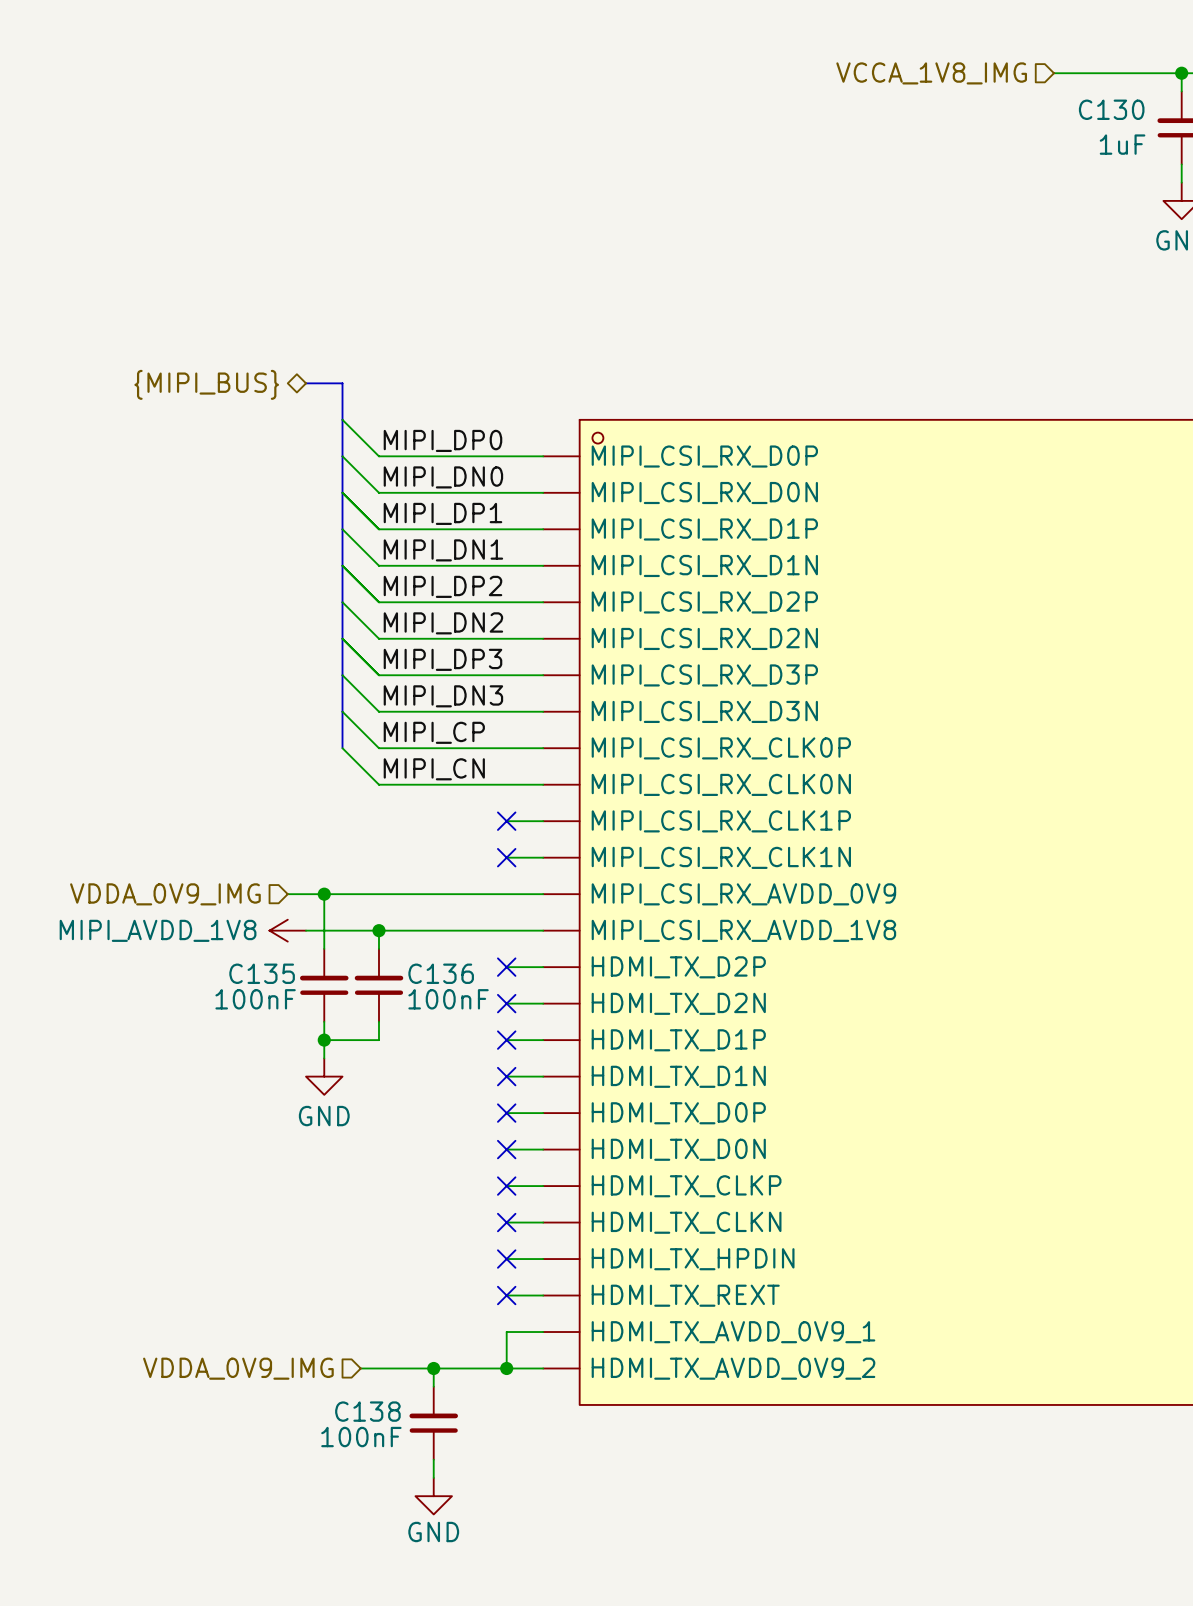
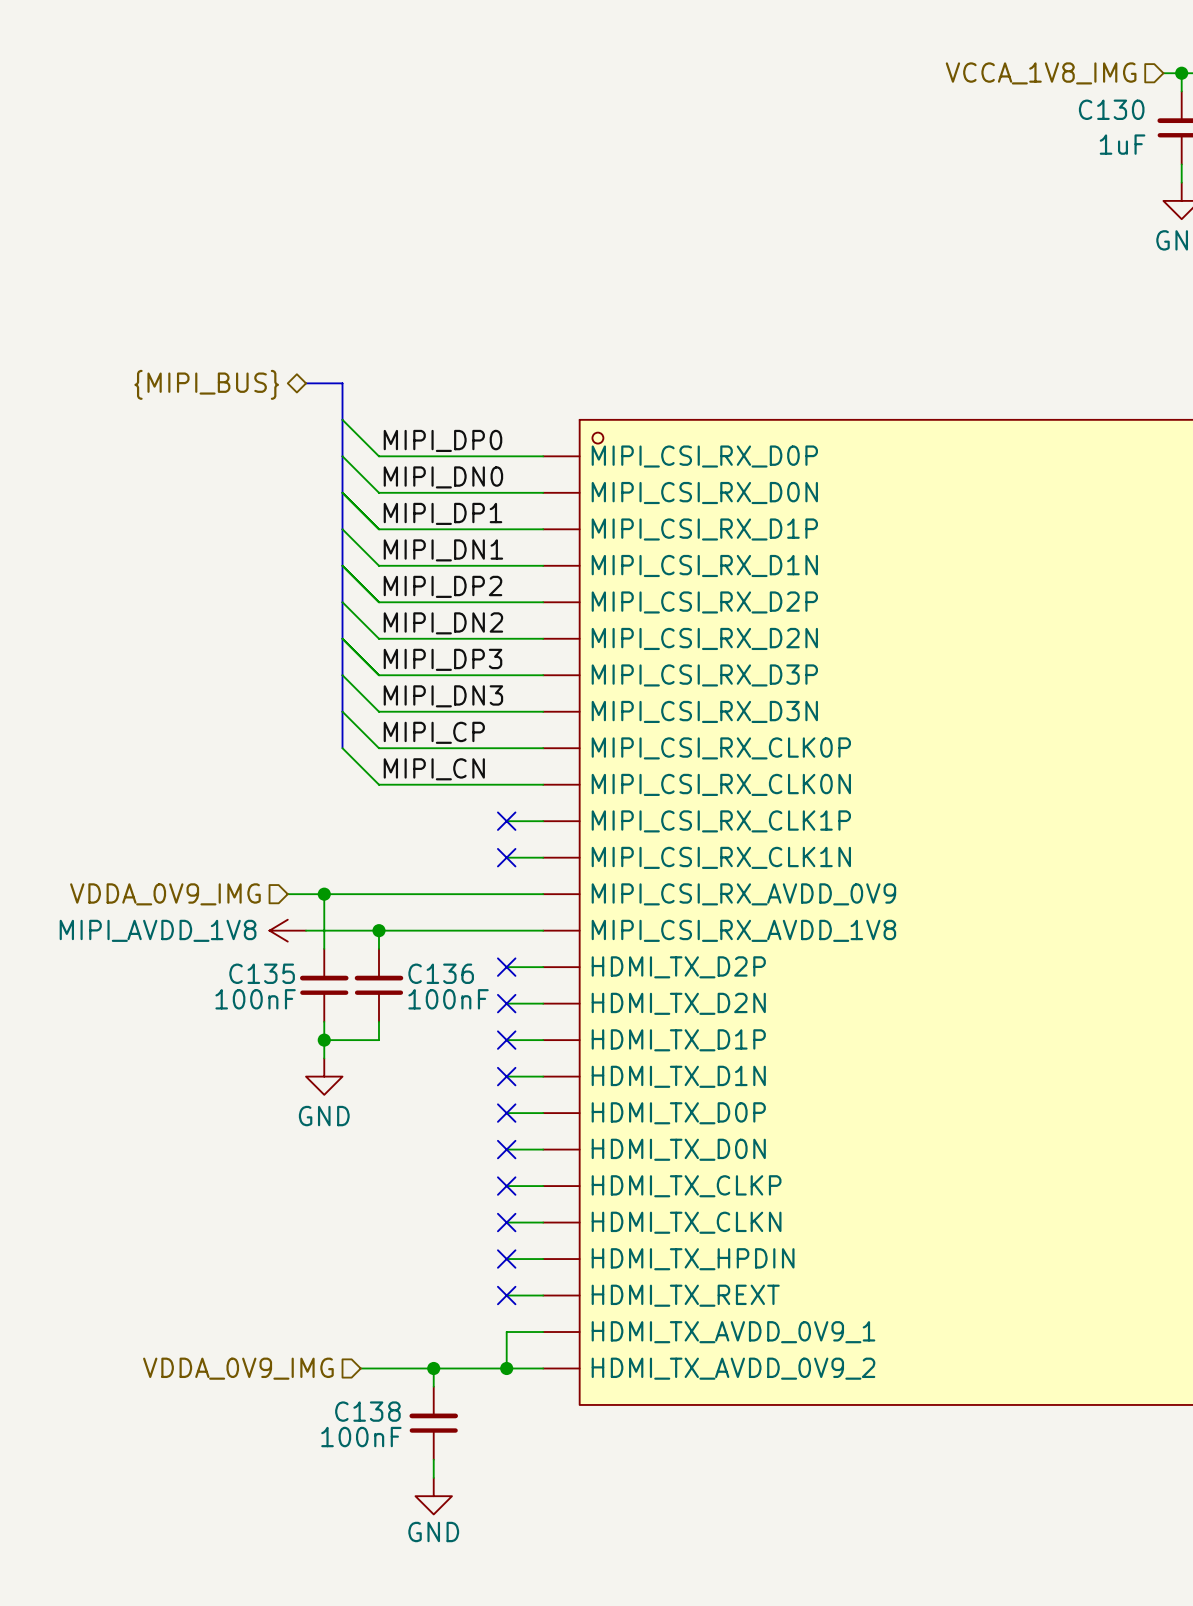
hierarchical label position: VCCA_1V8_IMG (931, 73) -> VCCA_1V8_IMG (1041, 73)
wire: (1053, 73) (1163, 73) -> none

